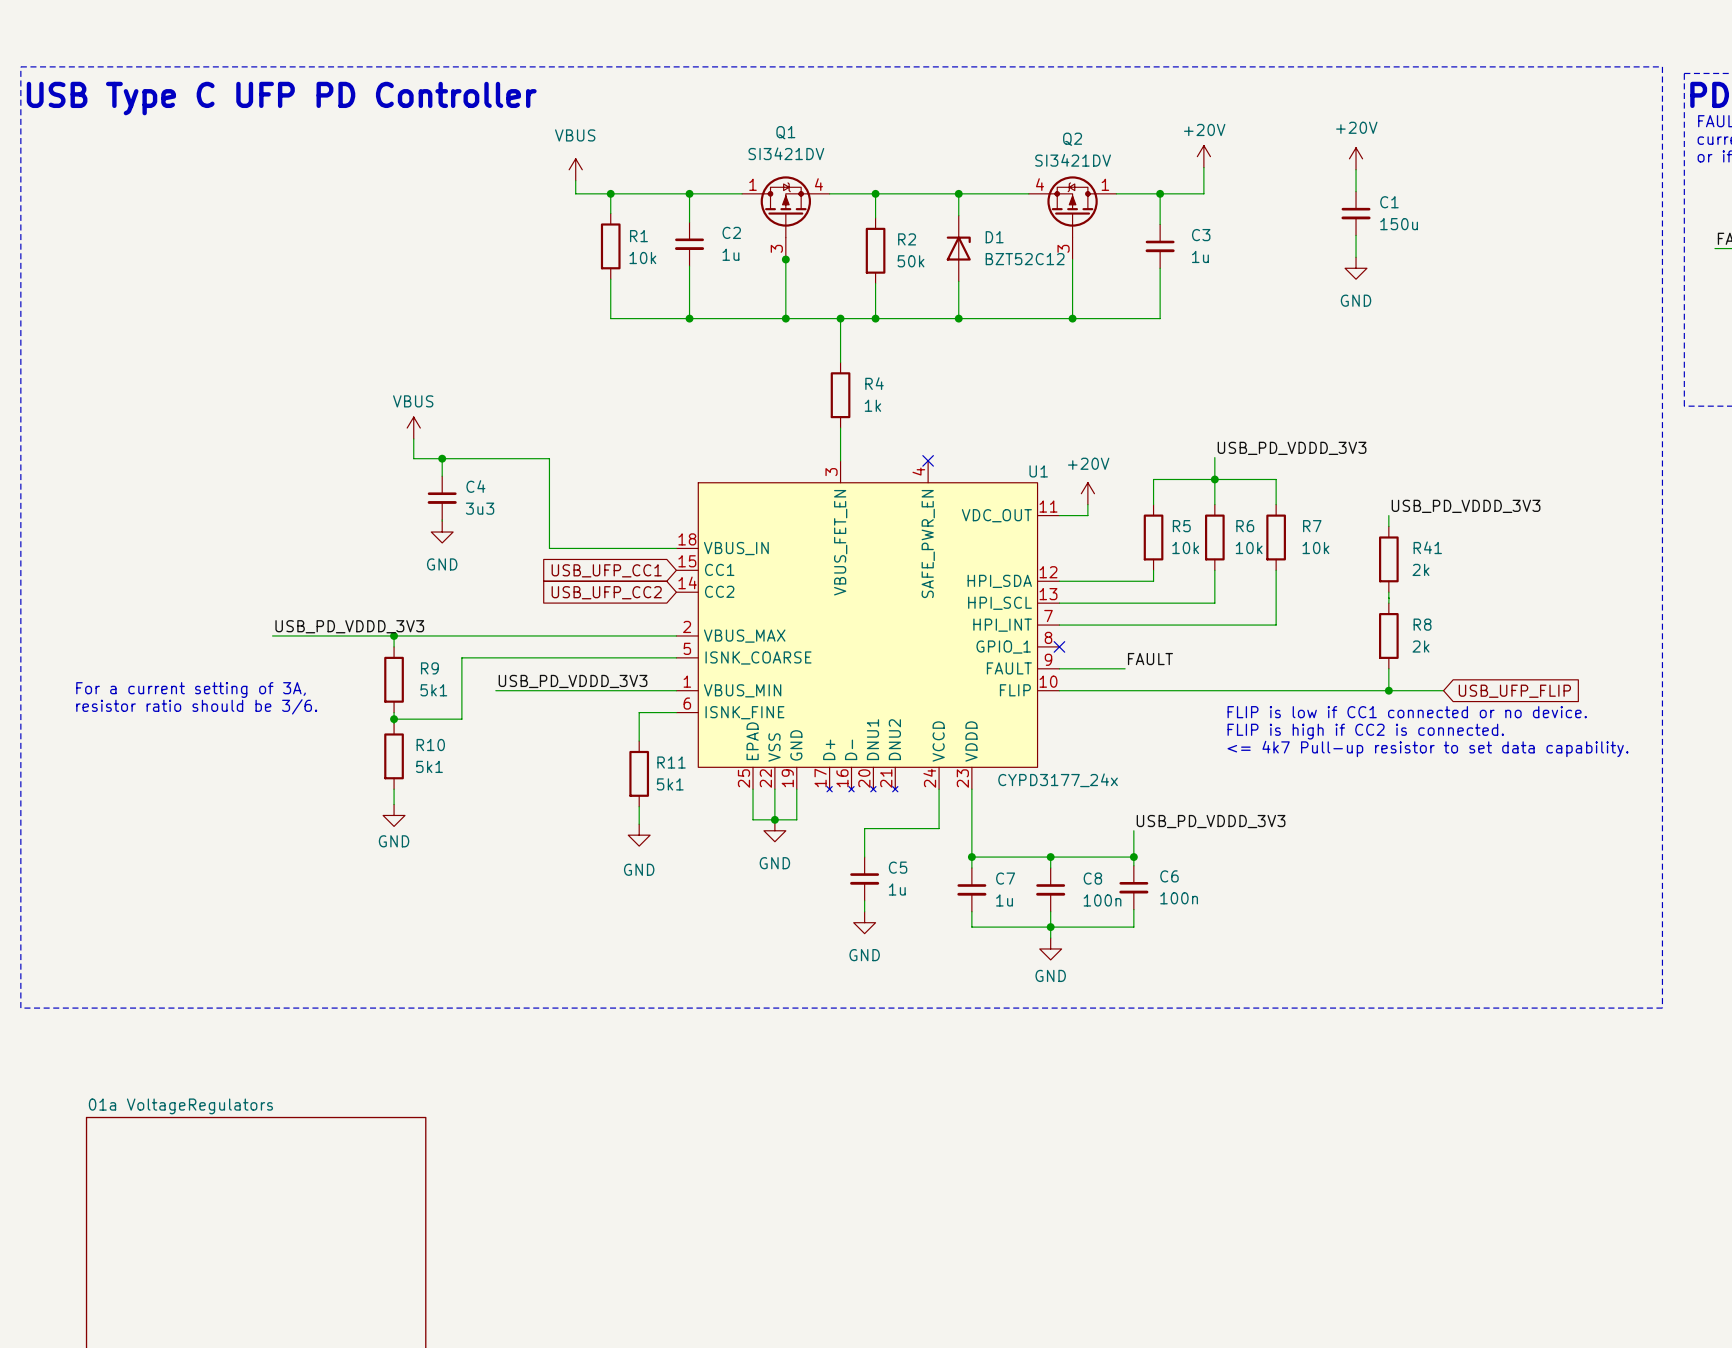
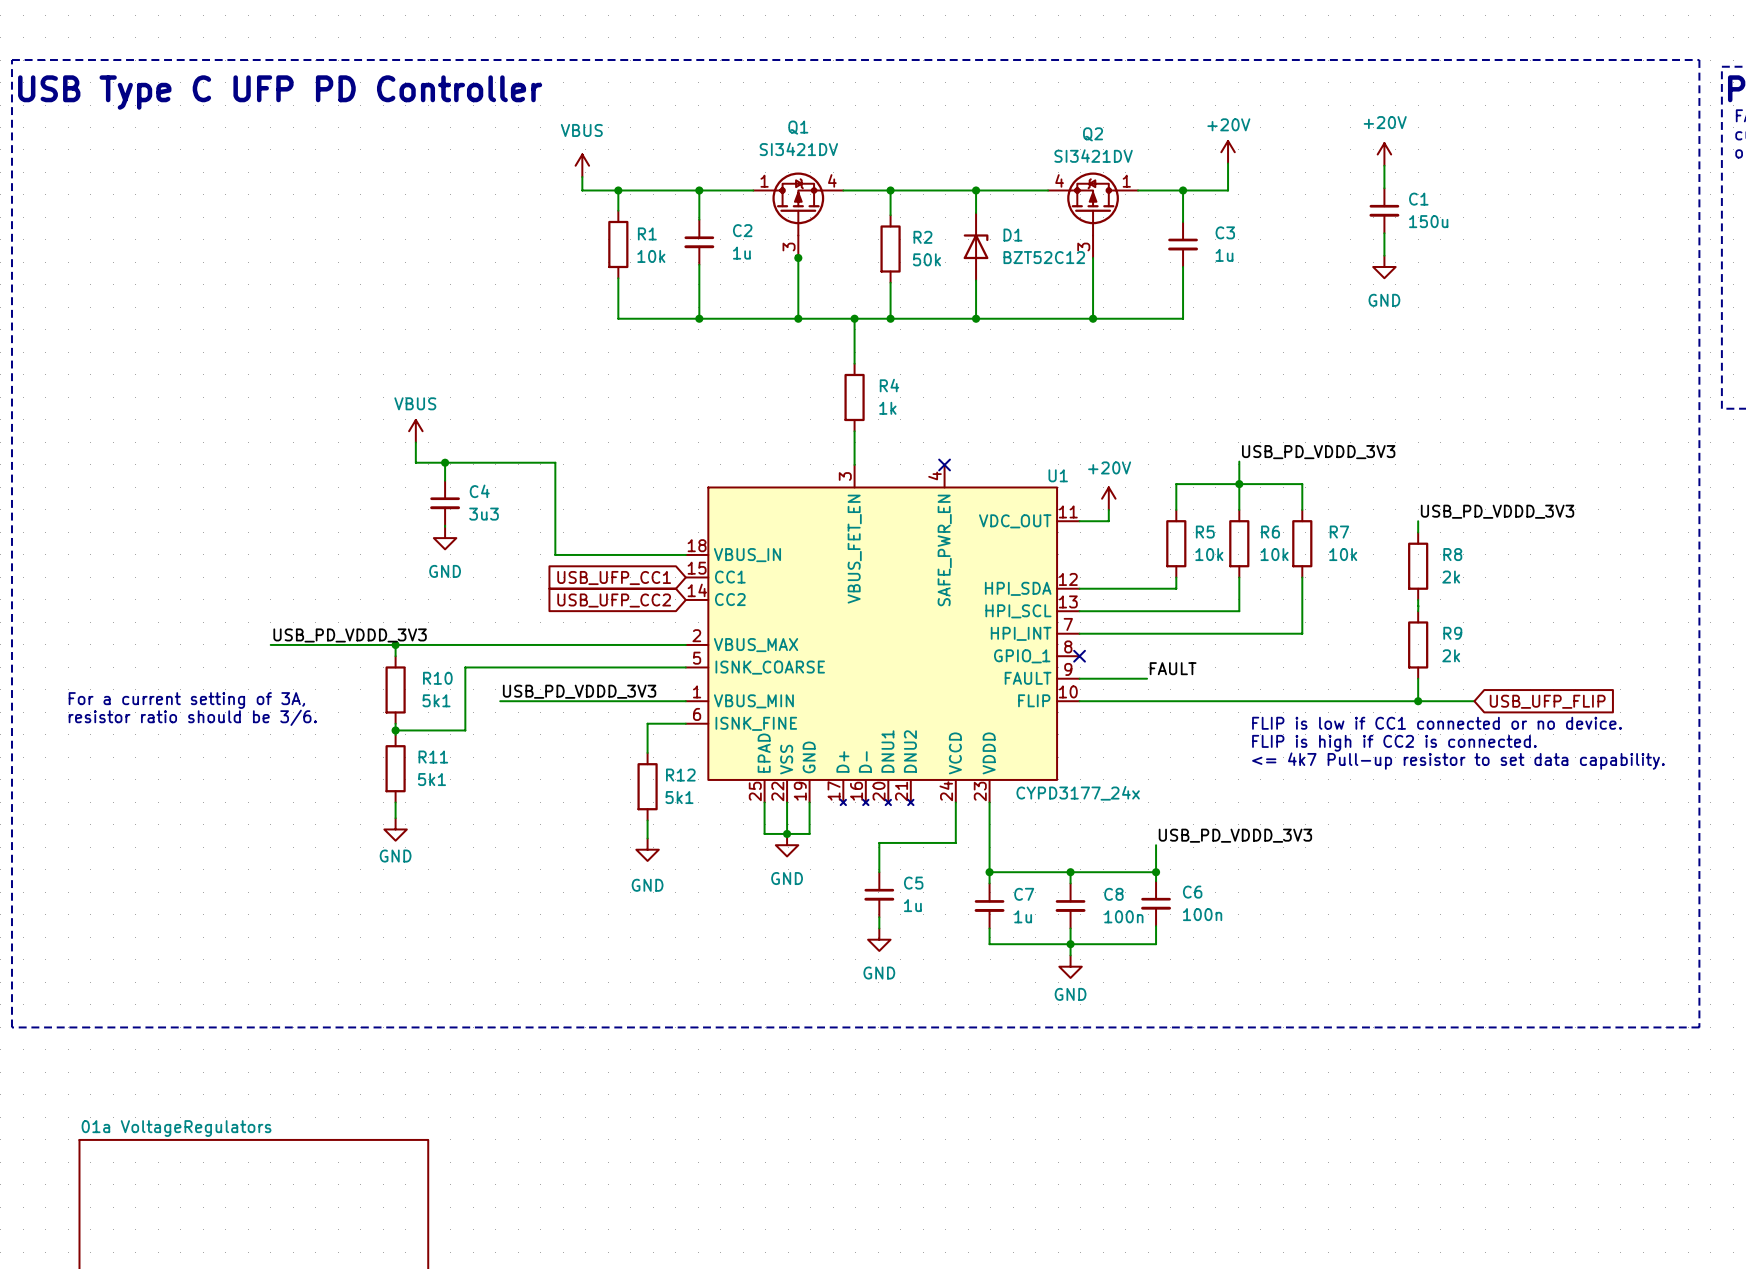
R41 name: R41 (1427, 547) -> R8 (1452, 554)
R8 name: R8 (1422, 624) -> R9 (1452, 633)
R9 name: R9 (429, 668) -> R10 (437, 678)
R10 name: R10 (430, 745) -> R11 (433, 757)
R11 name: R11 (671, 762) -> R12 (680, 775)

